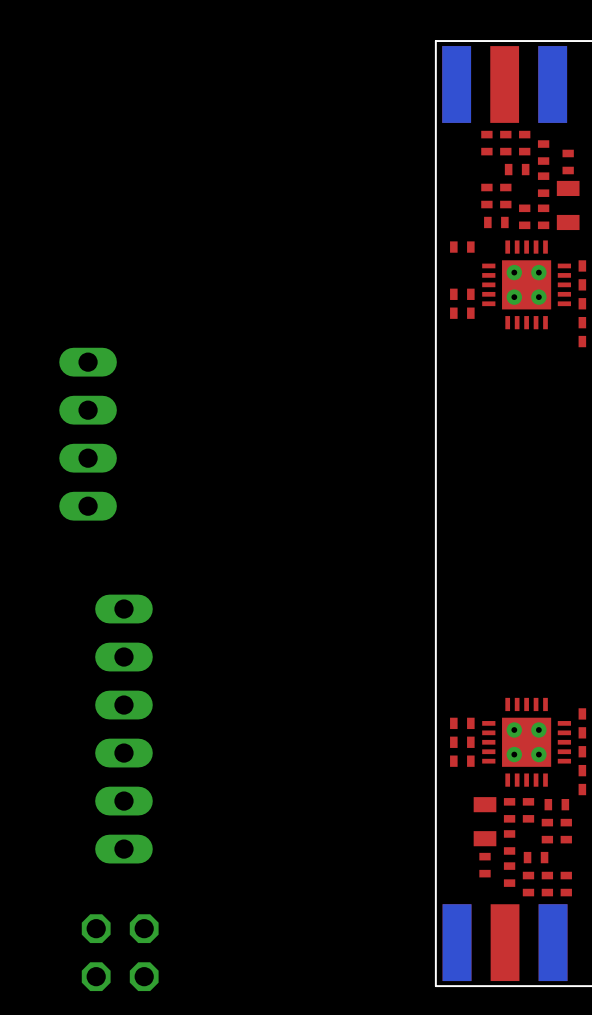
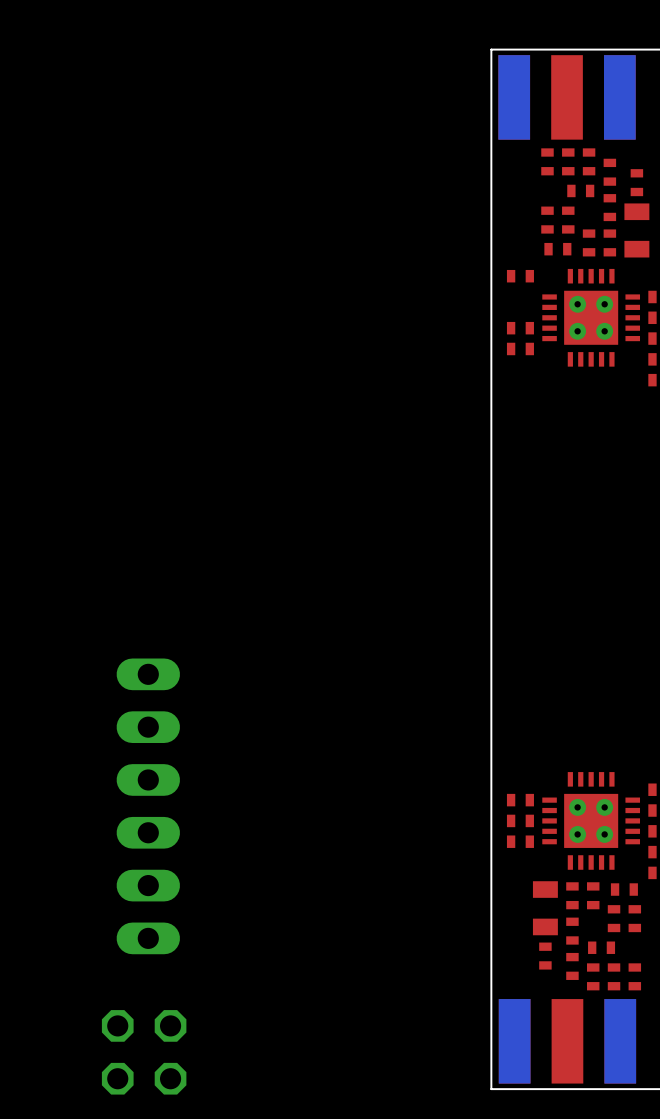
part: (88, 434) -> none

